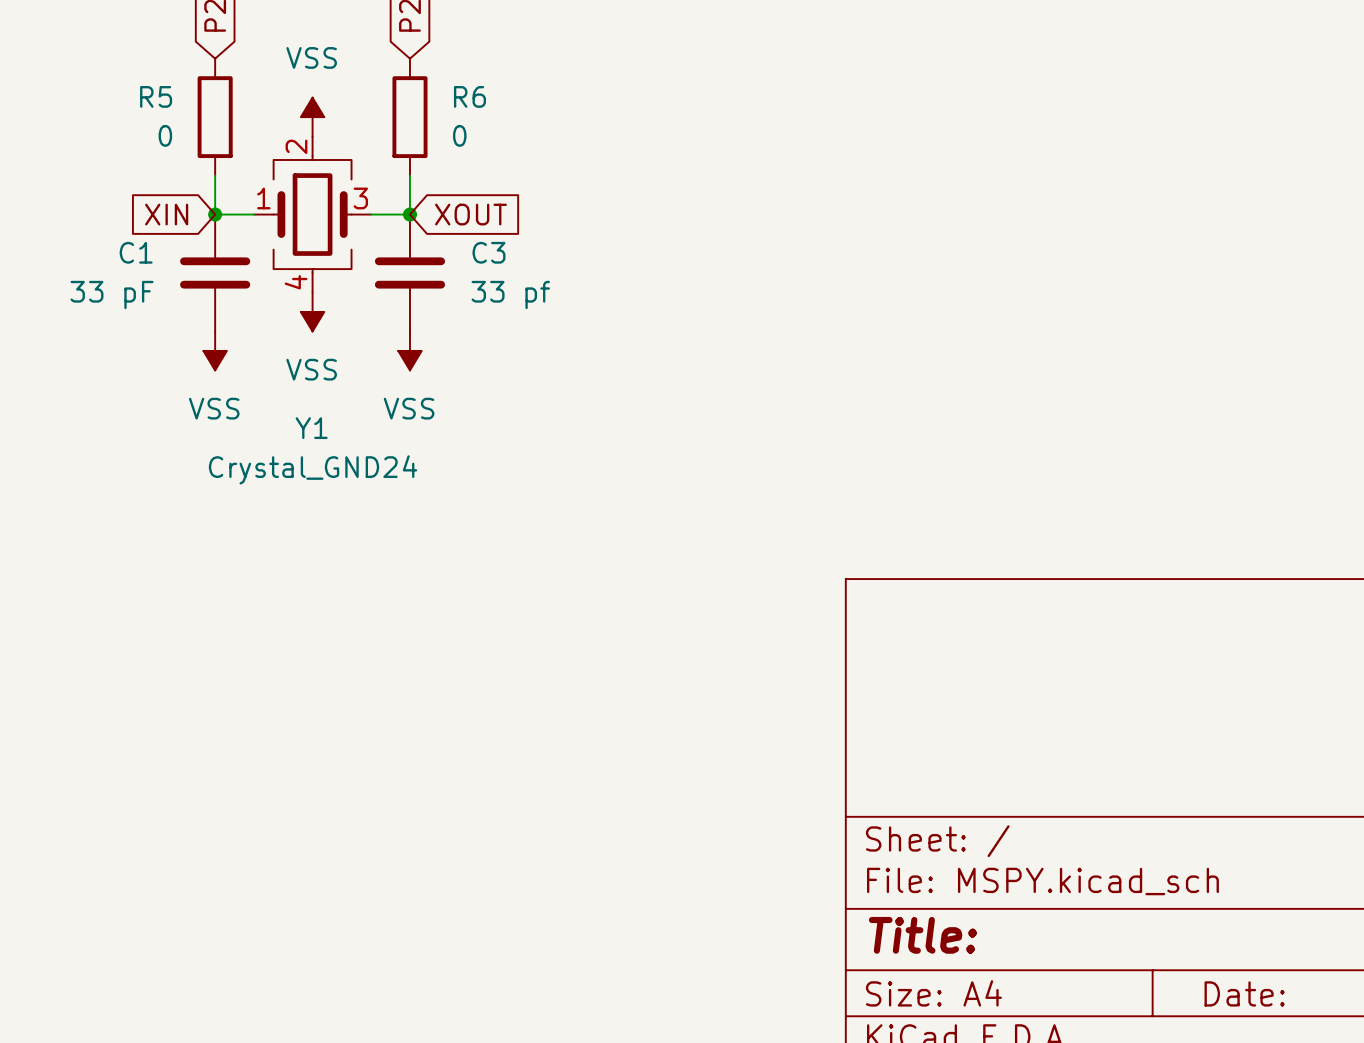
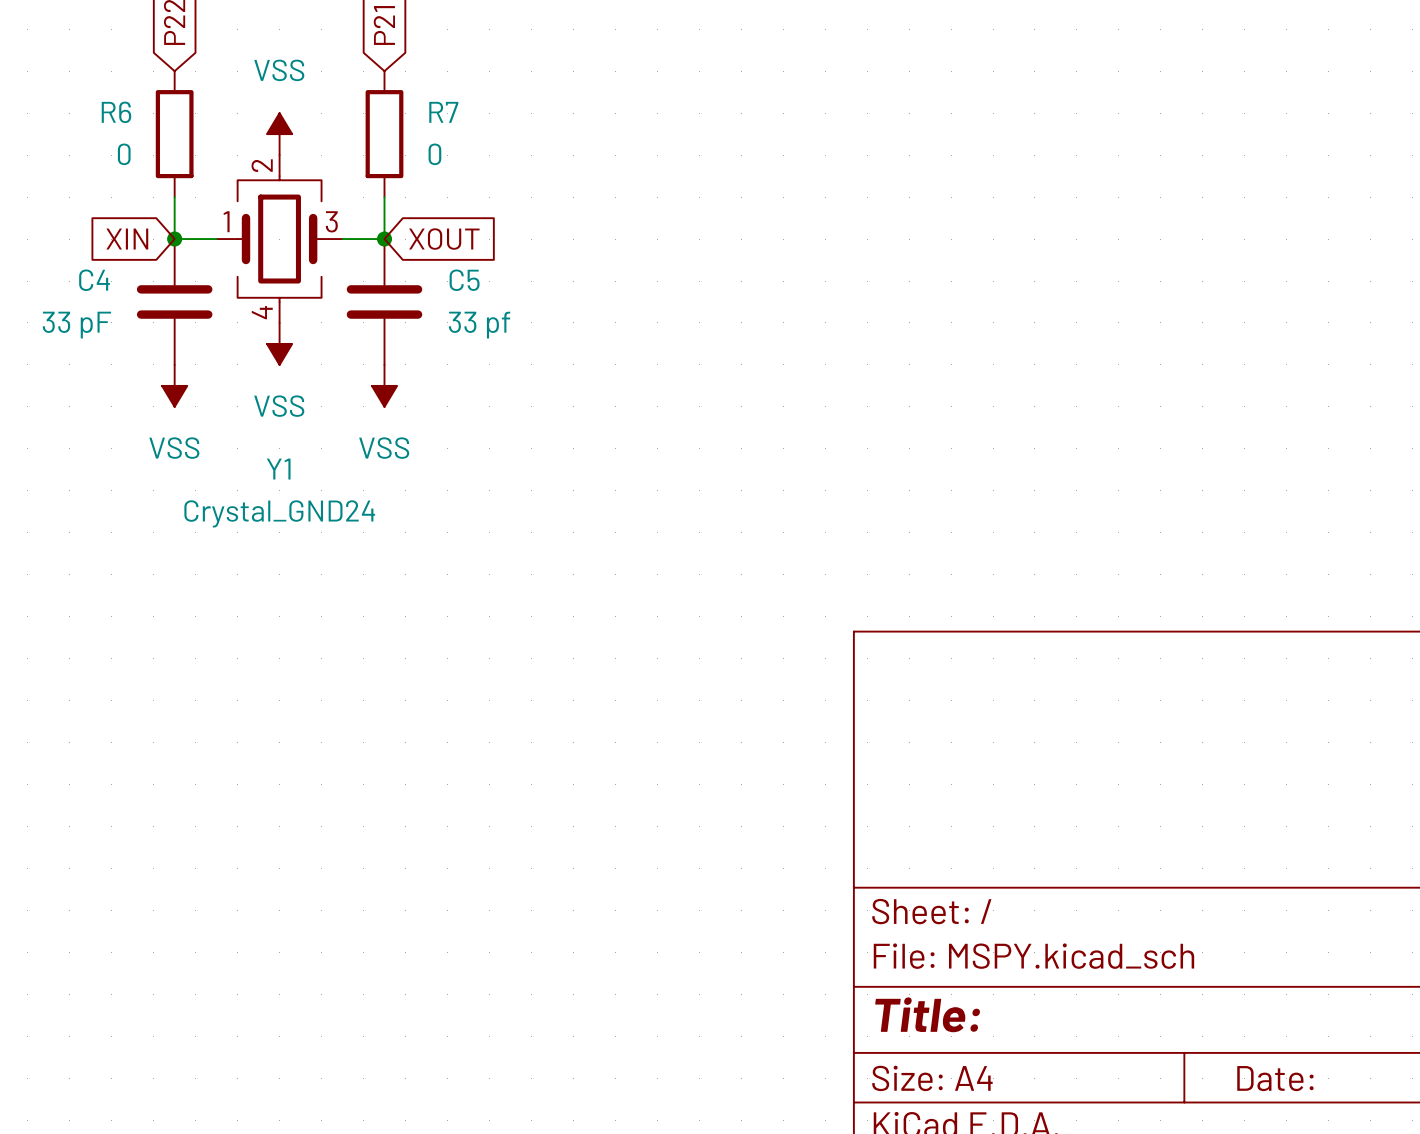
R5 name: R5 (156, 96) -> R6 (116, 112)
R6 name: R6 (469, 96) -> R7 (443, 112)
C1 name: C1 (136, 252) -> C4 (94, 280)
C3 name: C3 (488, 252) -> C5 (464, 280)

